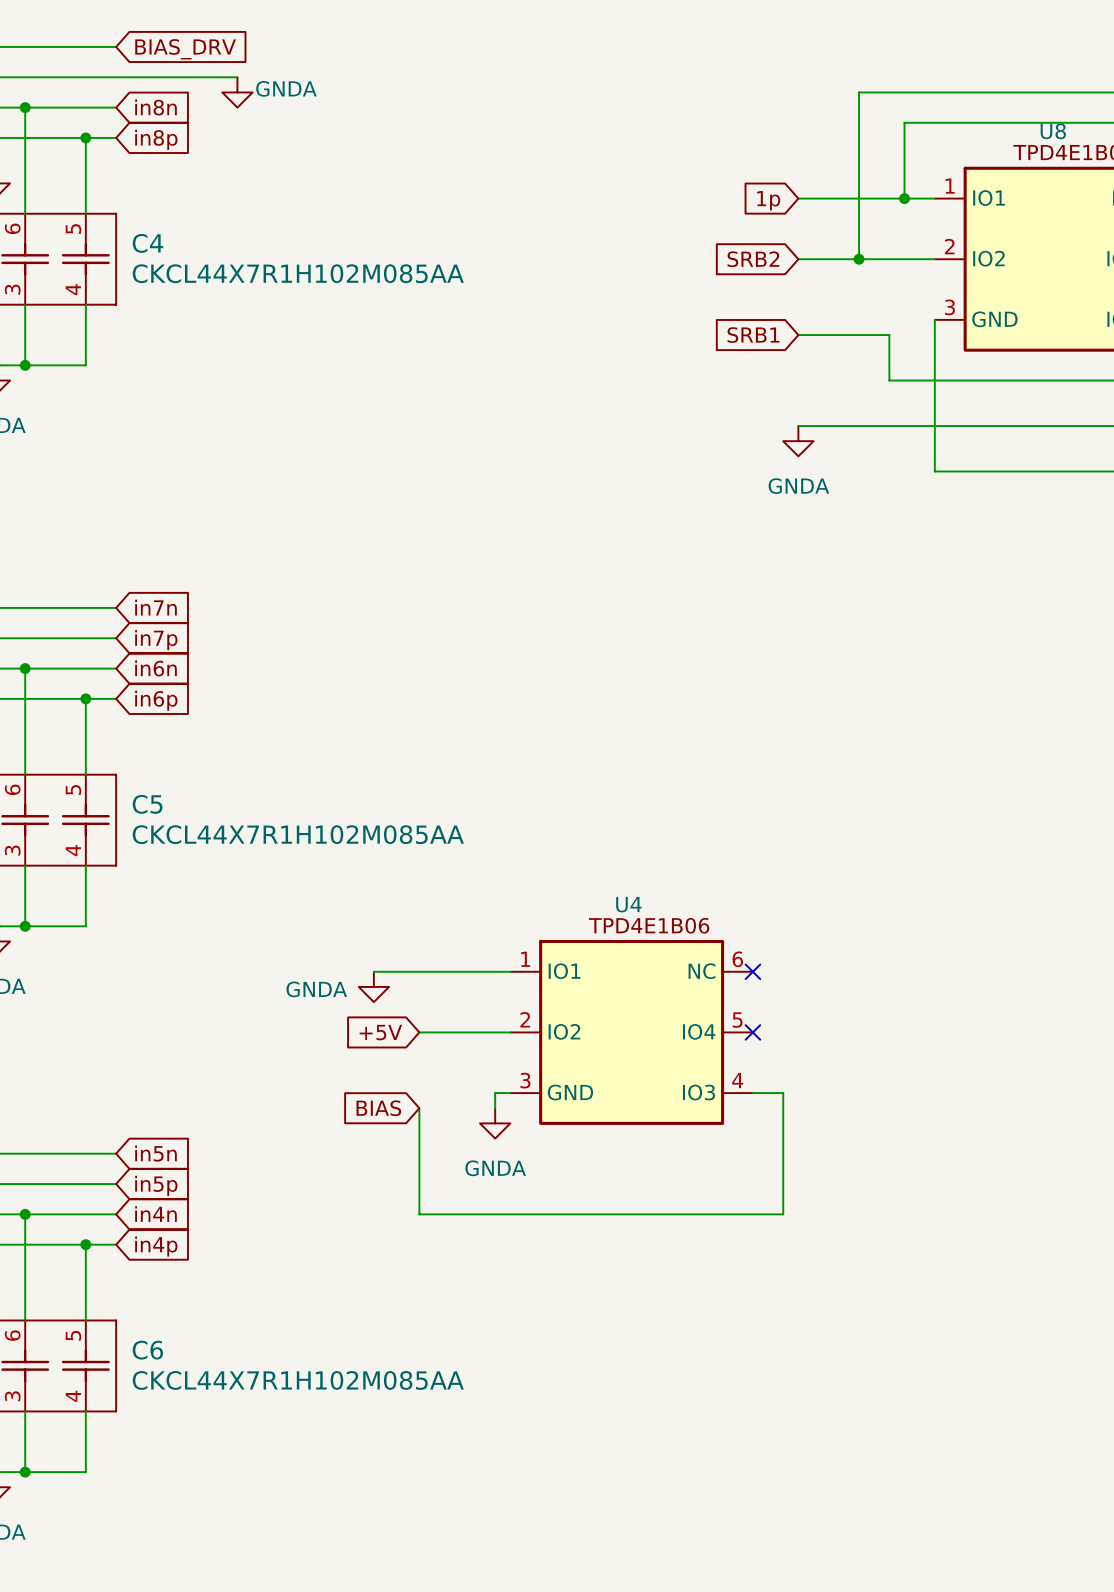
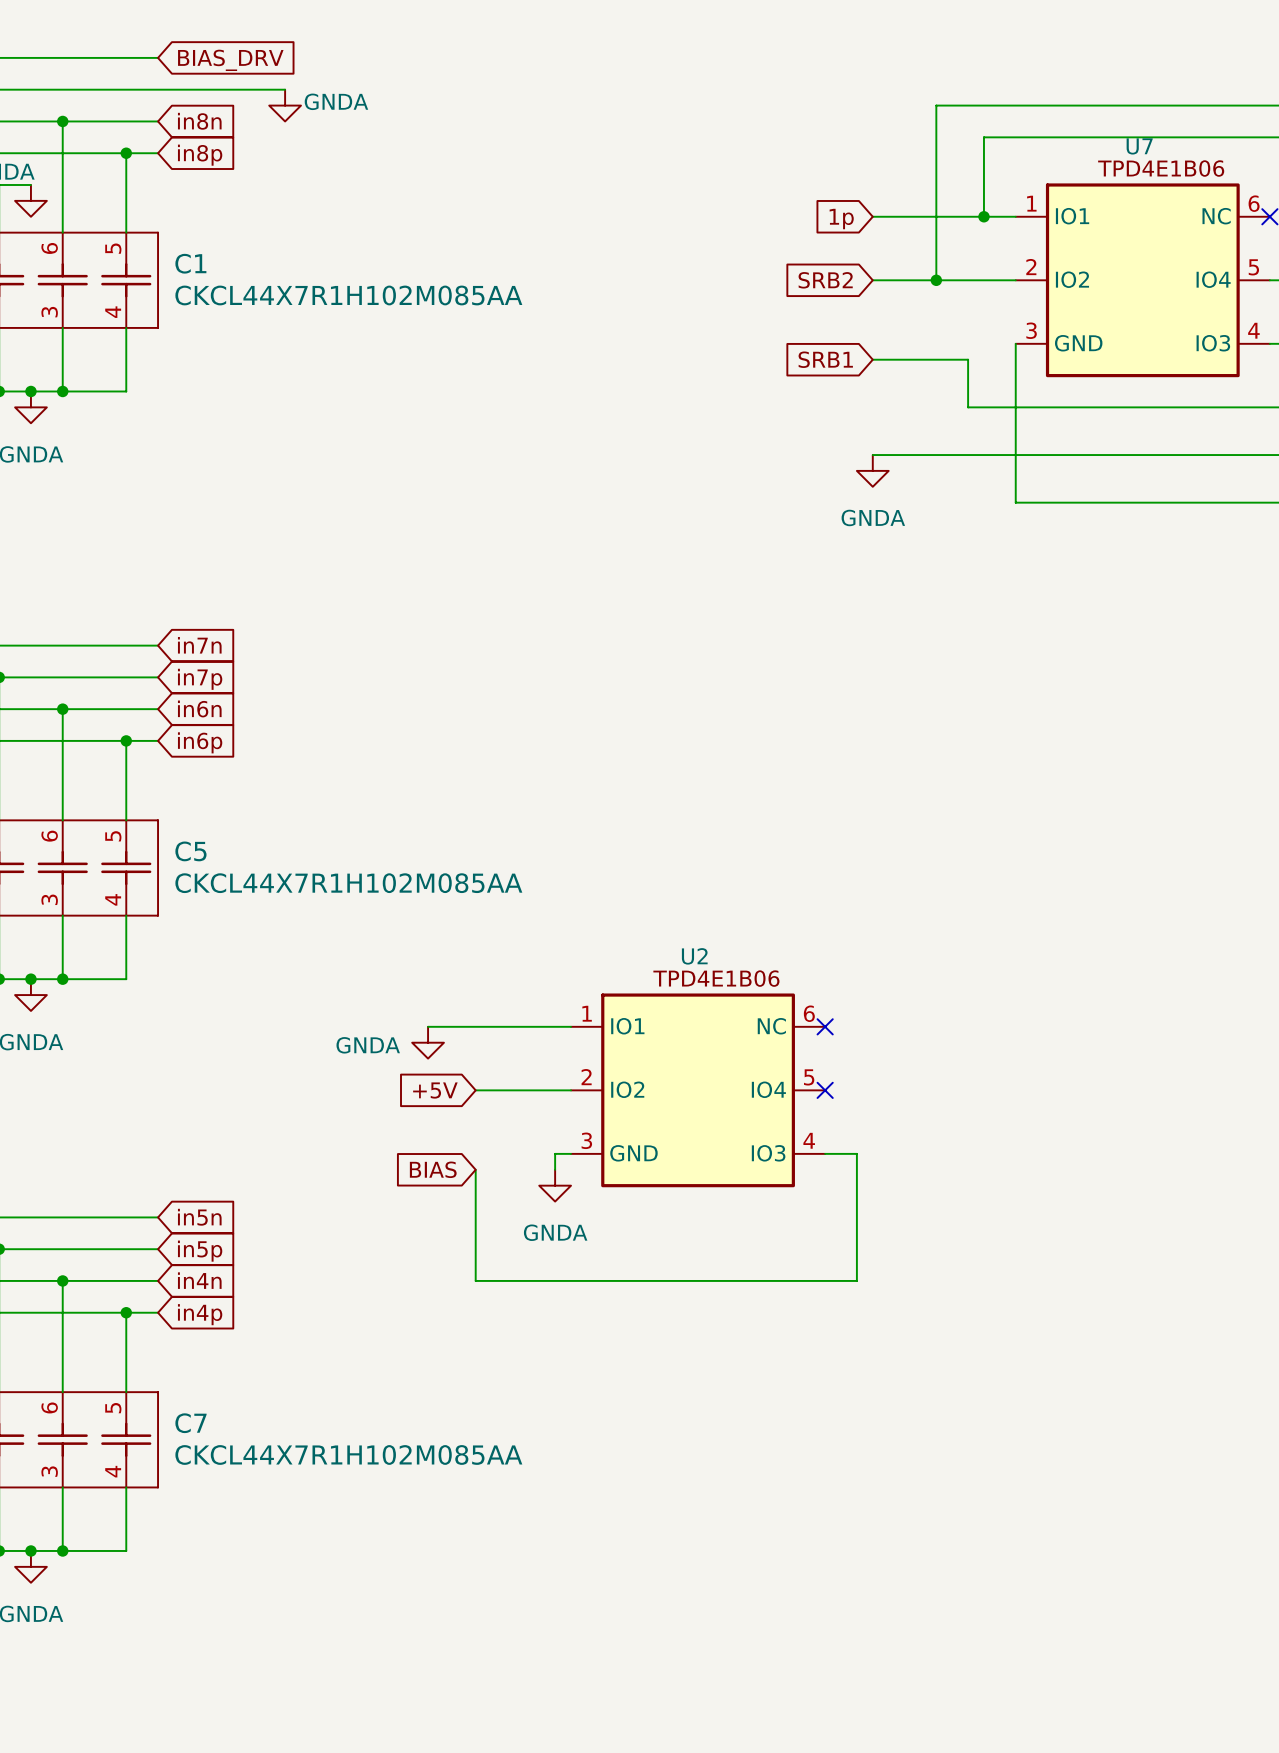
U8 name: U8 (1053, 131) -> U7 (1139, 146)
C4 name: C4 (147, 243) -> C1 (190, 263)
U4 name: U4 (628, 904) -> U2 (694, 956)
C6 name: C6 (147, 1350) -> C7 (190, 1423)

